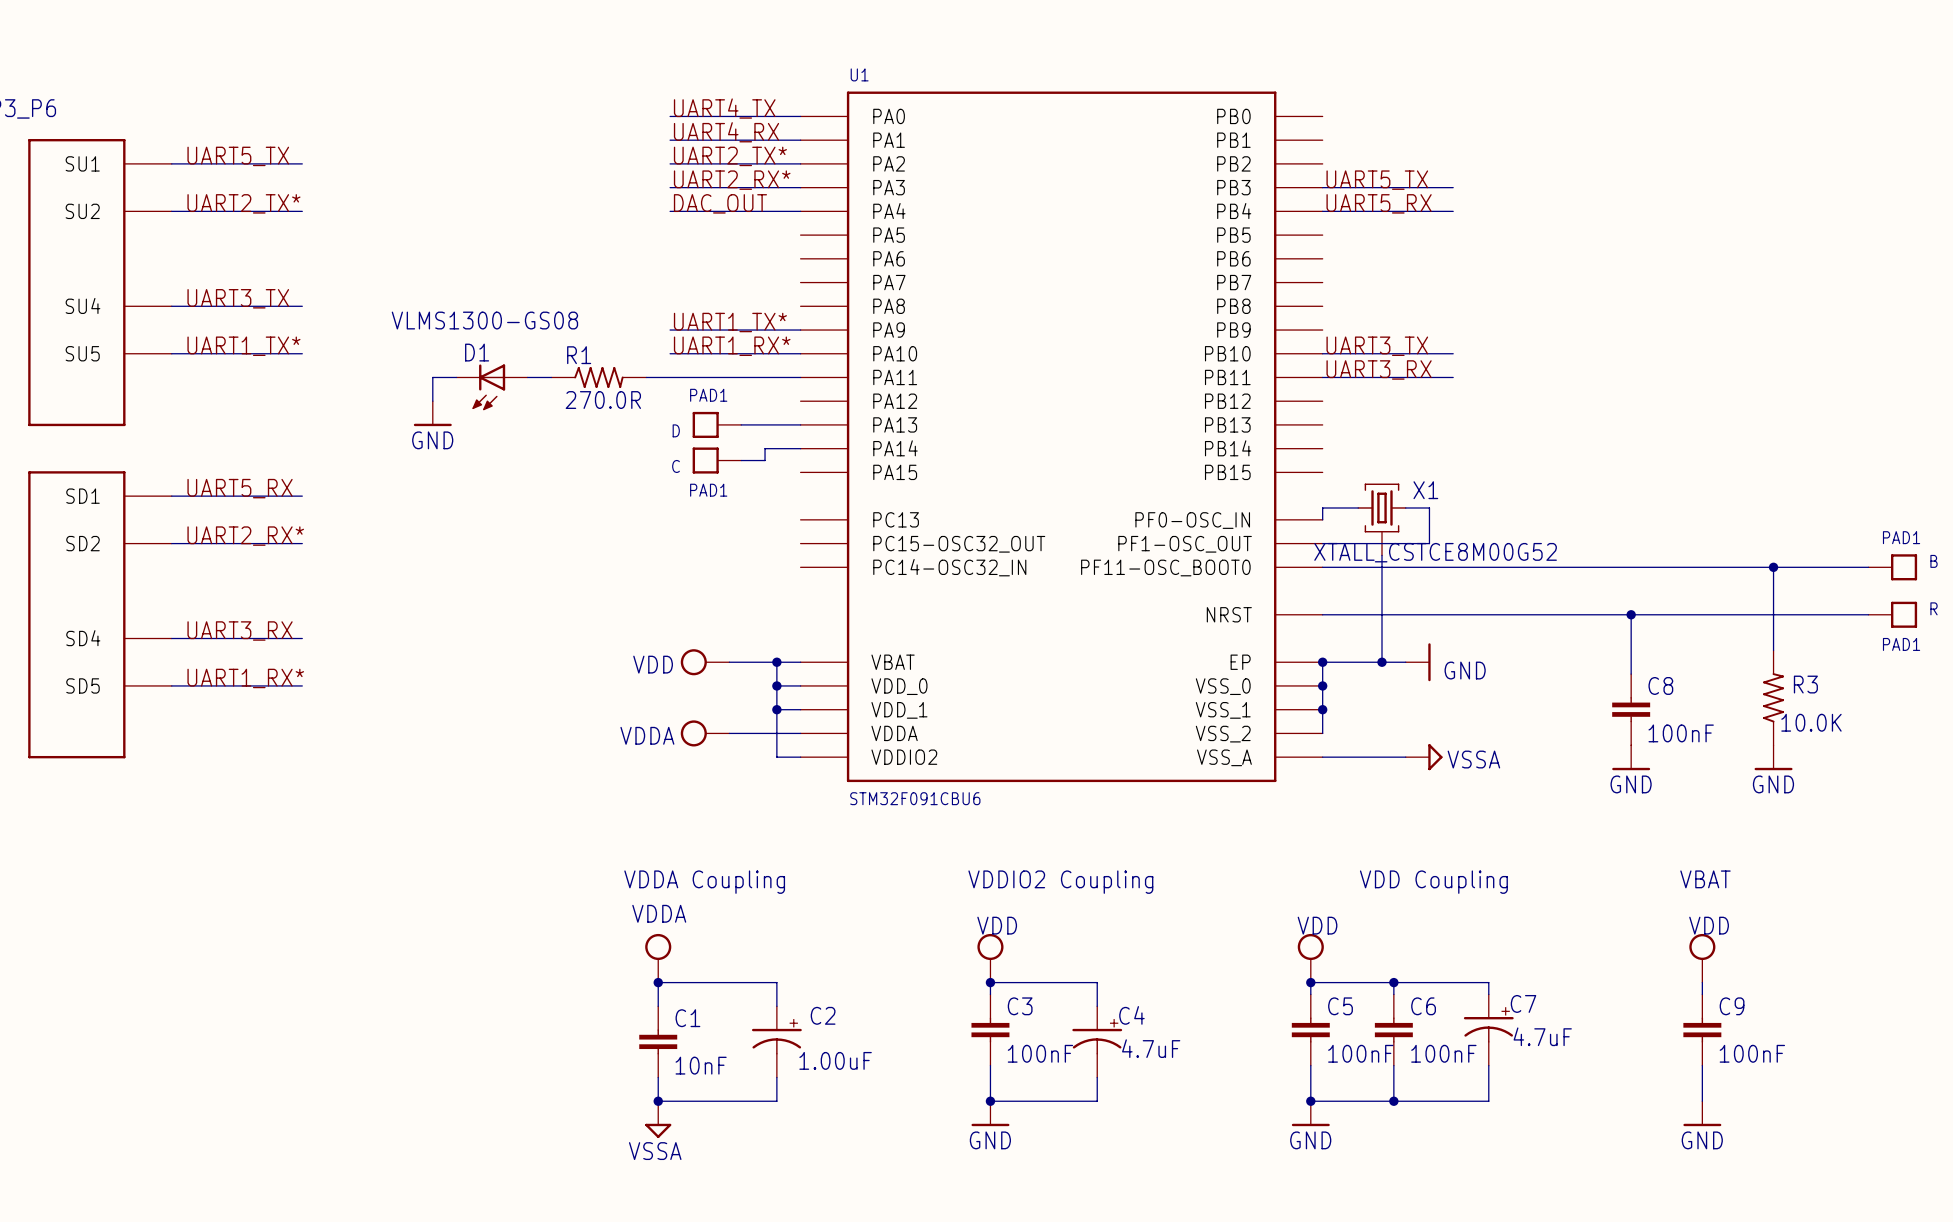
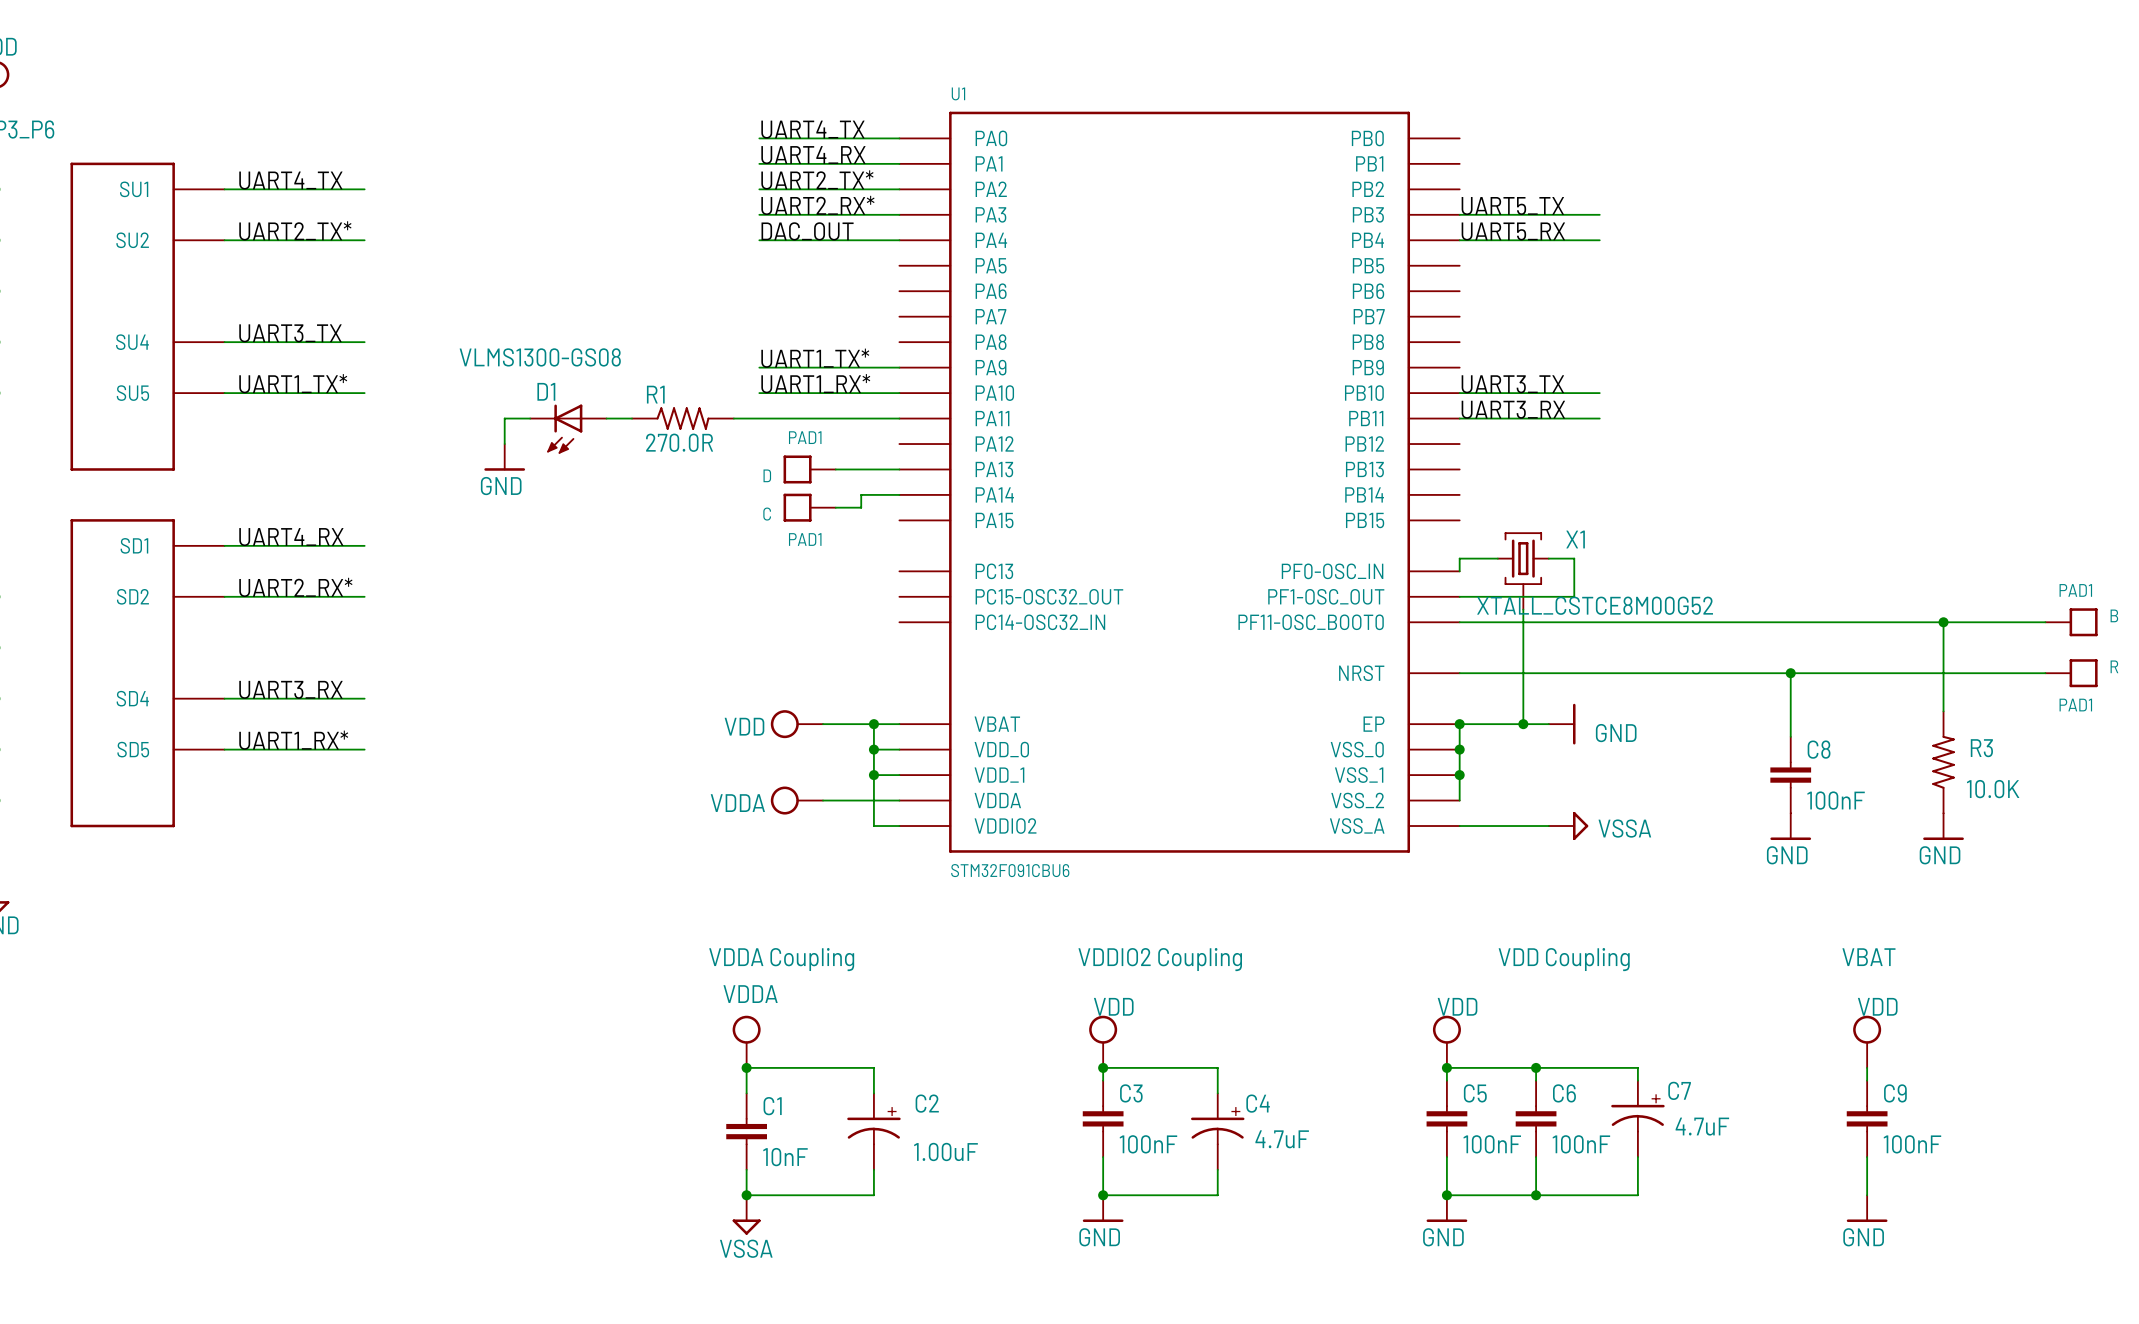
label: UART5_TX (238, 156) -> UART4_TX (290, 180)
label: UART5_RX (240, 488) -> UART4_RX (291, 537)

